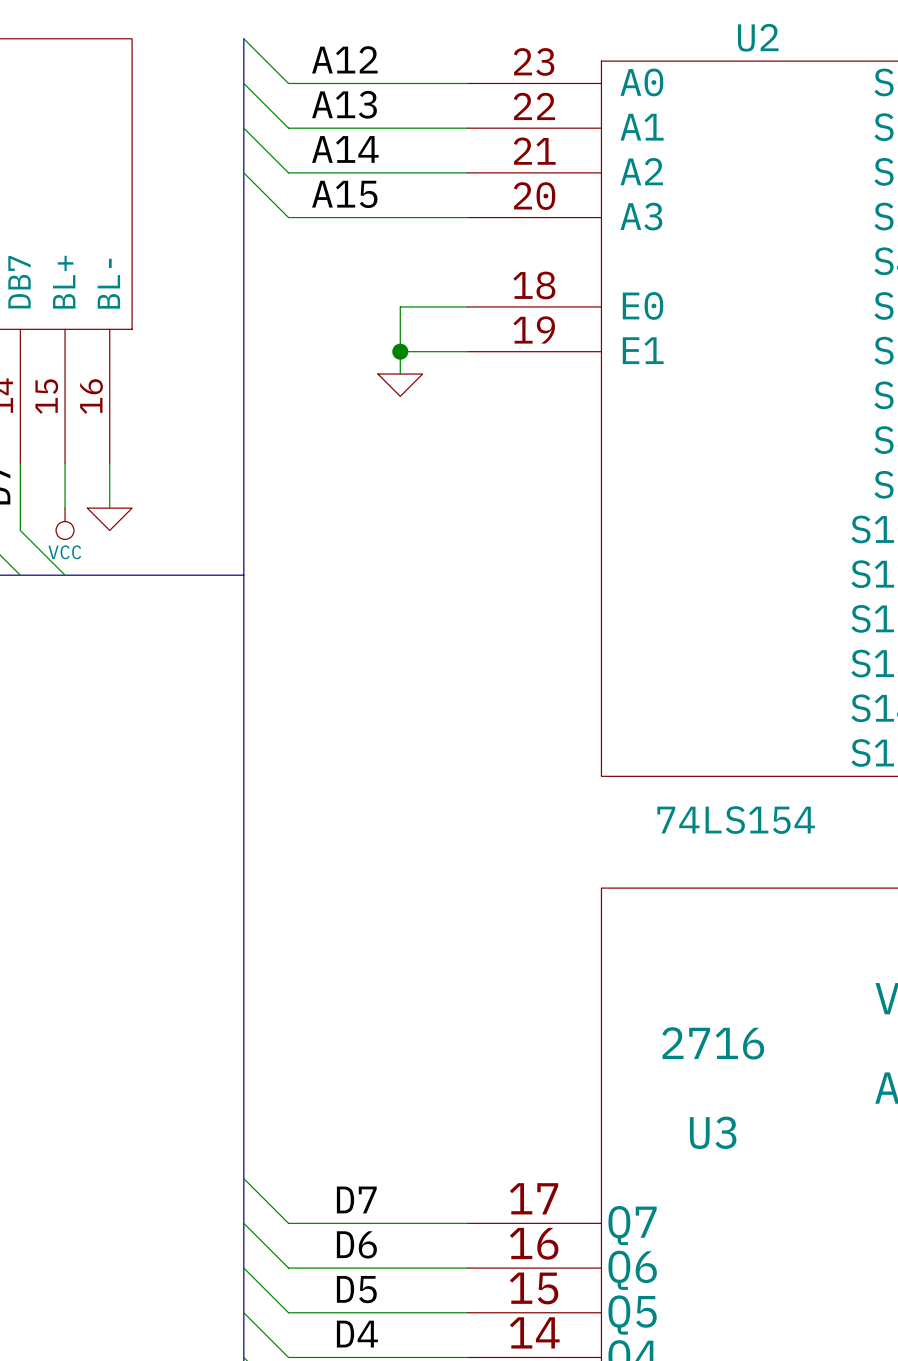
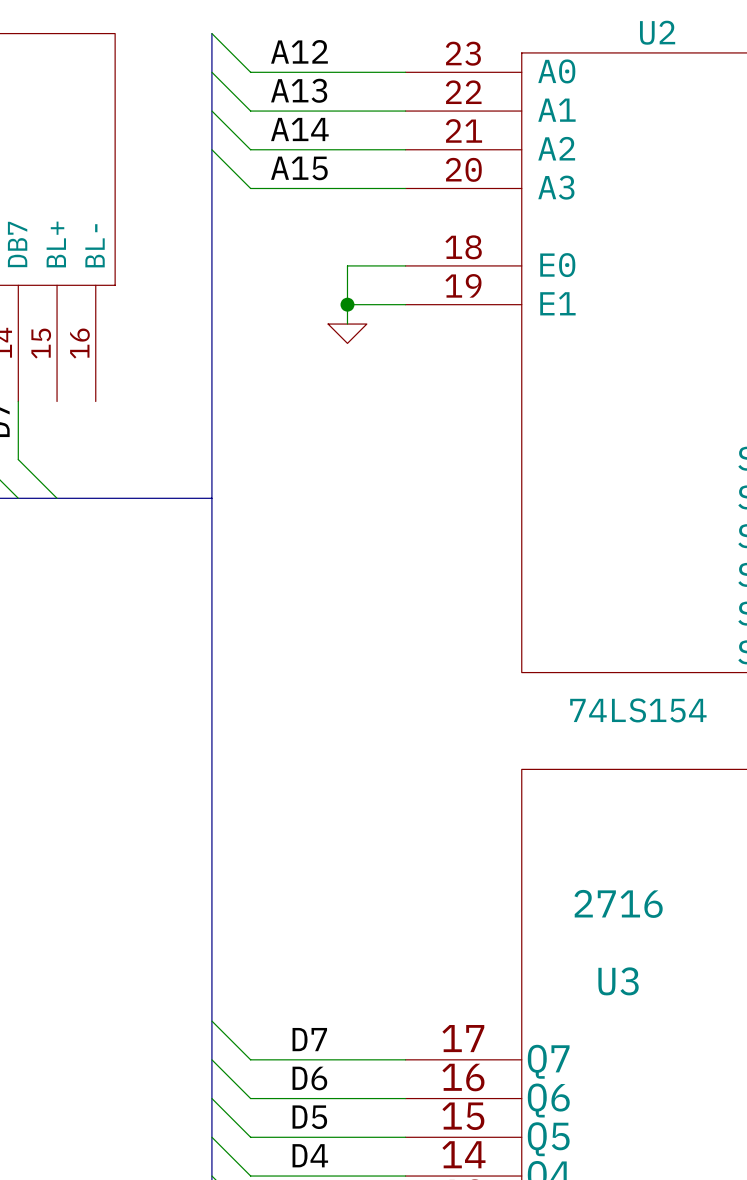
wire: (65, 463) (65, 508) -> none
wire: (109, 463) (109, 508) -> none
power symbol: (109, 519) -> none
power symbol: VCC (65, 523) -> none

